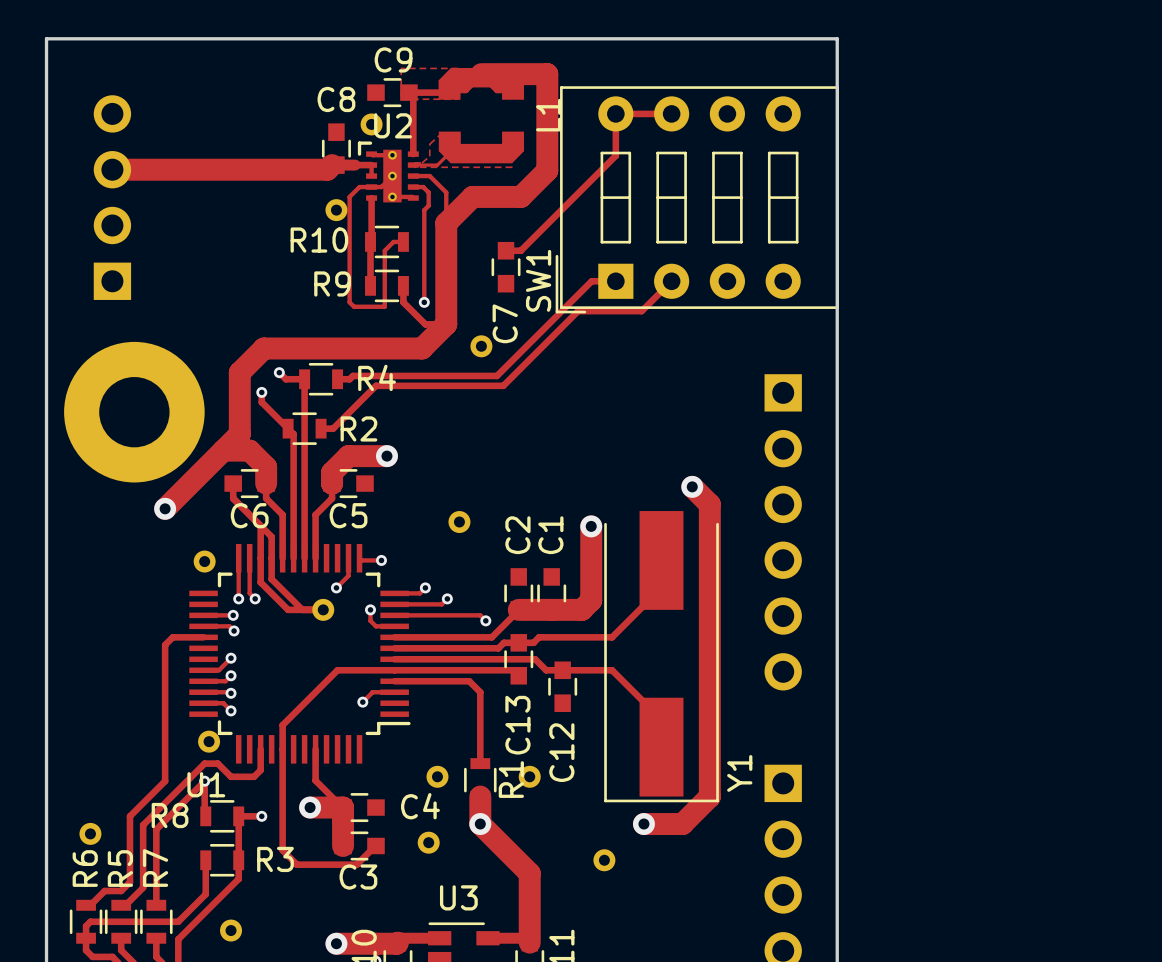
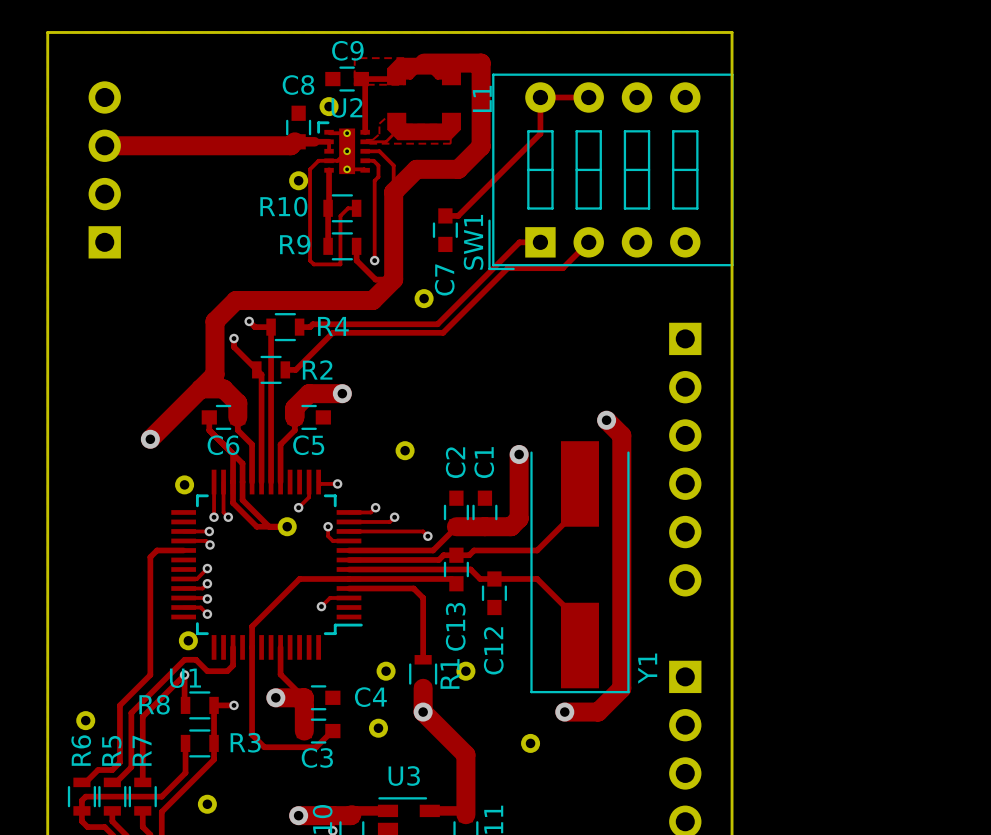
part: (134, 412) -> none

